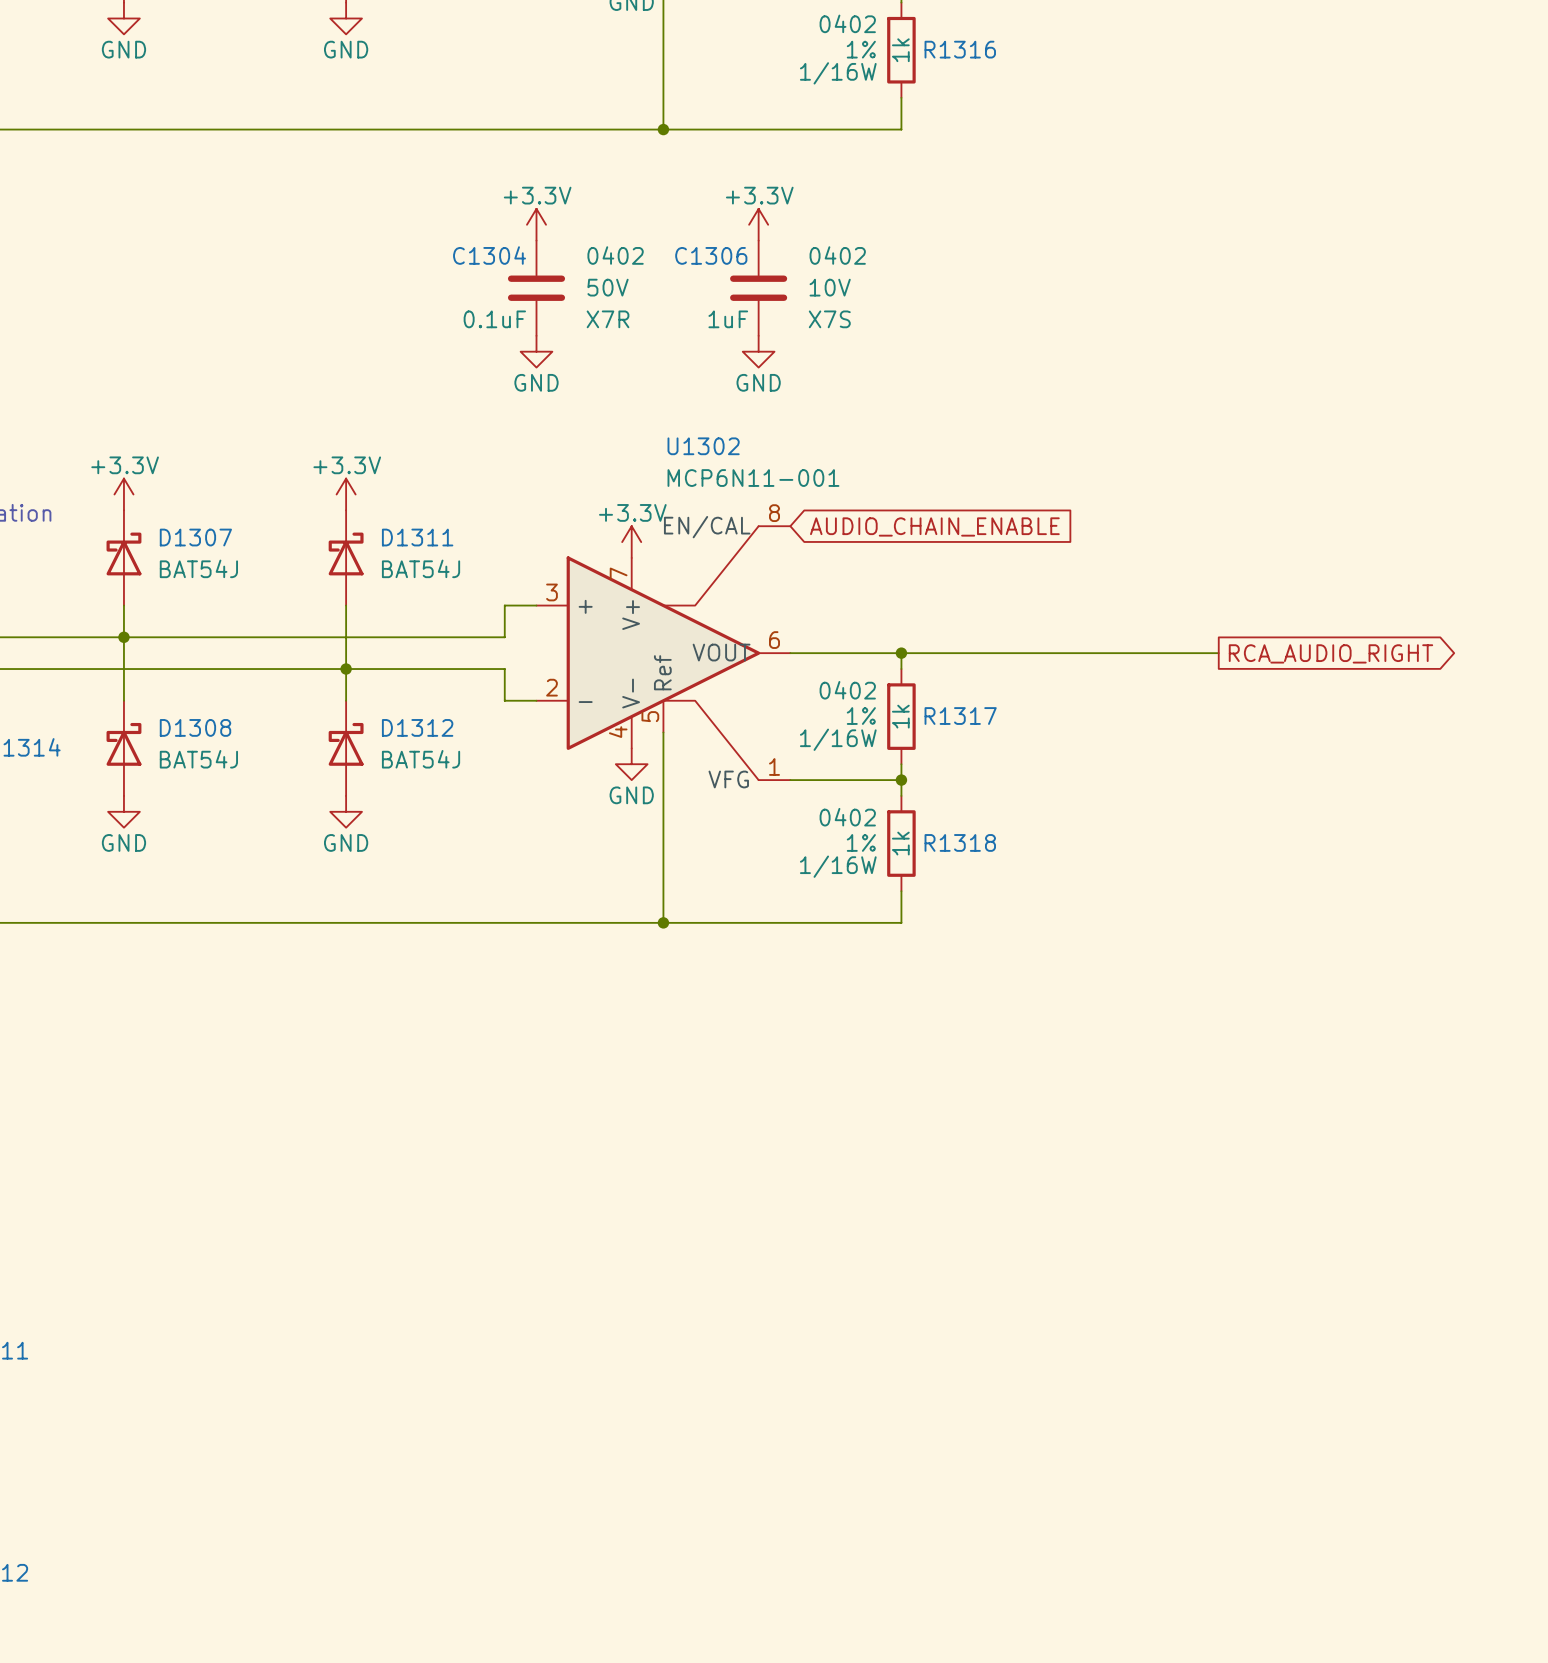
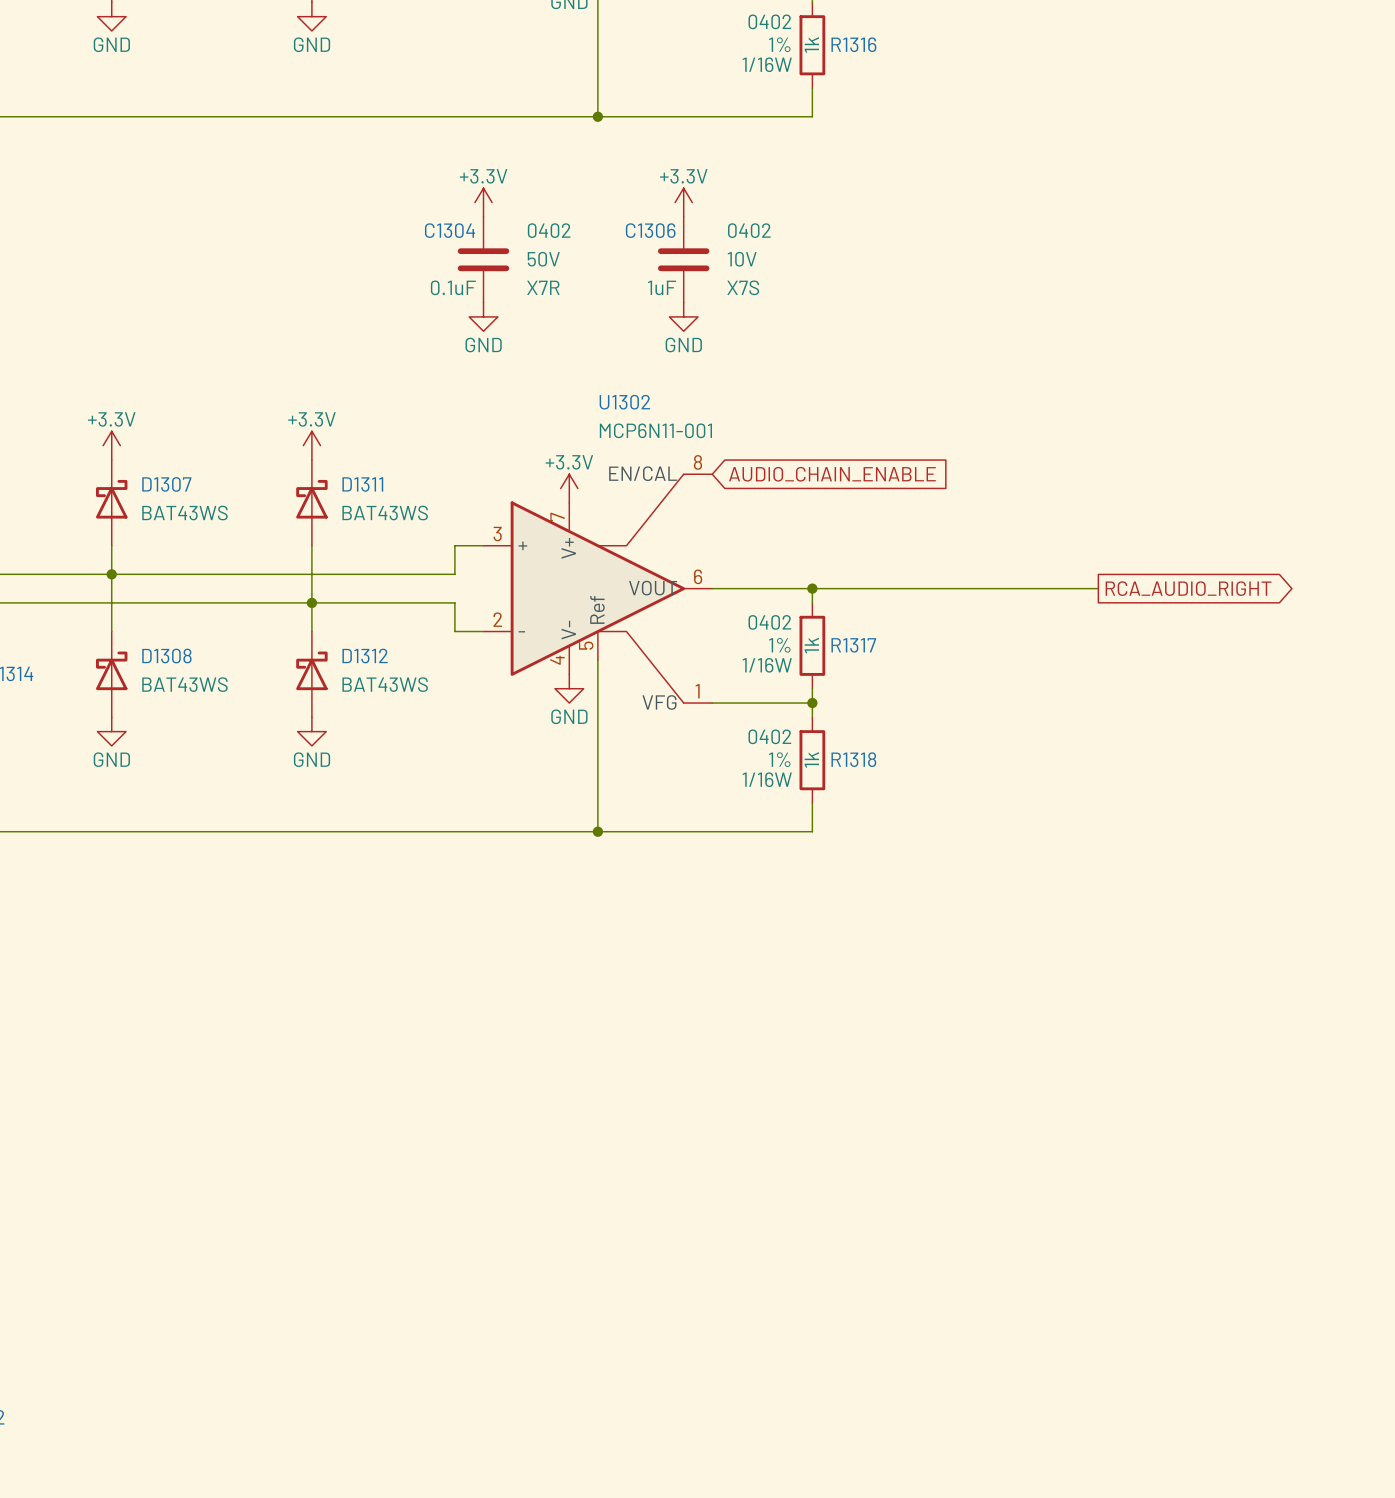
D1307 value: BAT54J (198, 568) -> BAT43WS (184, 513)
D1311 value: BAT54J (421, 568) -> BAT43WS (385, 513)
D1308 value: BAT54J (198, 759) -> BAT43WS (184, 684)
D1312 value: BAT54J (421, 759) -> BAT43WS (385, 684)

